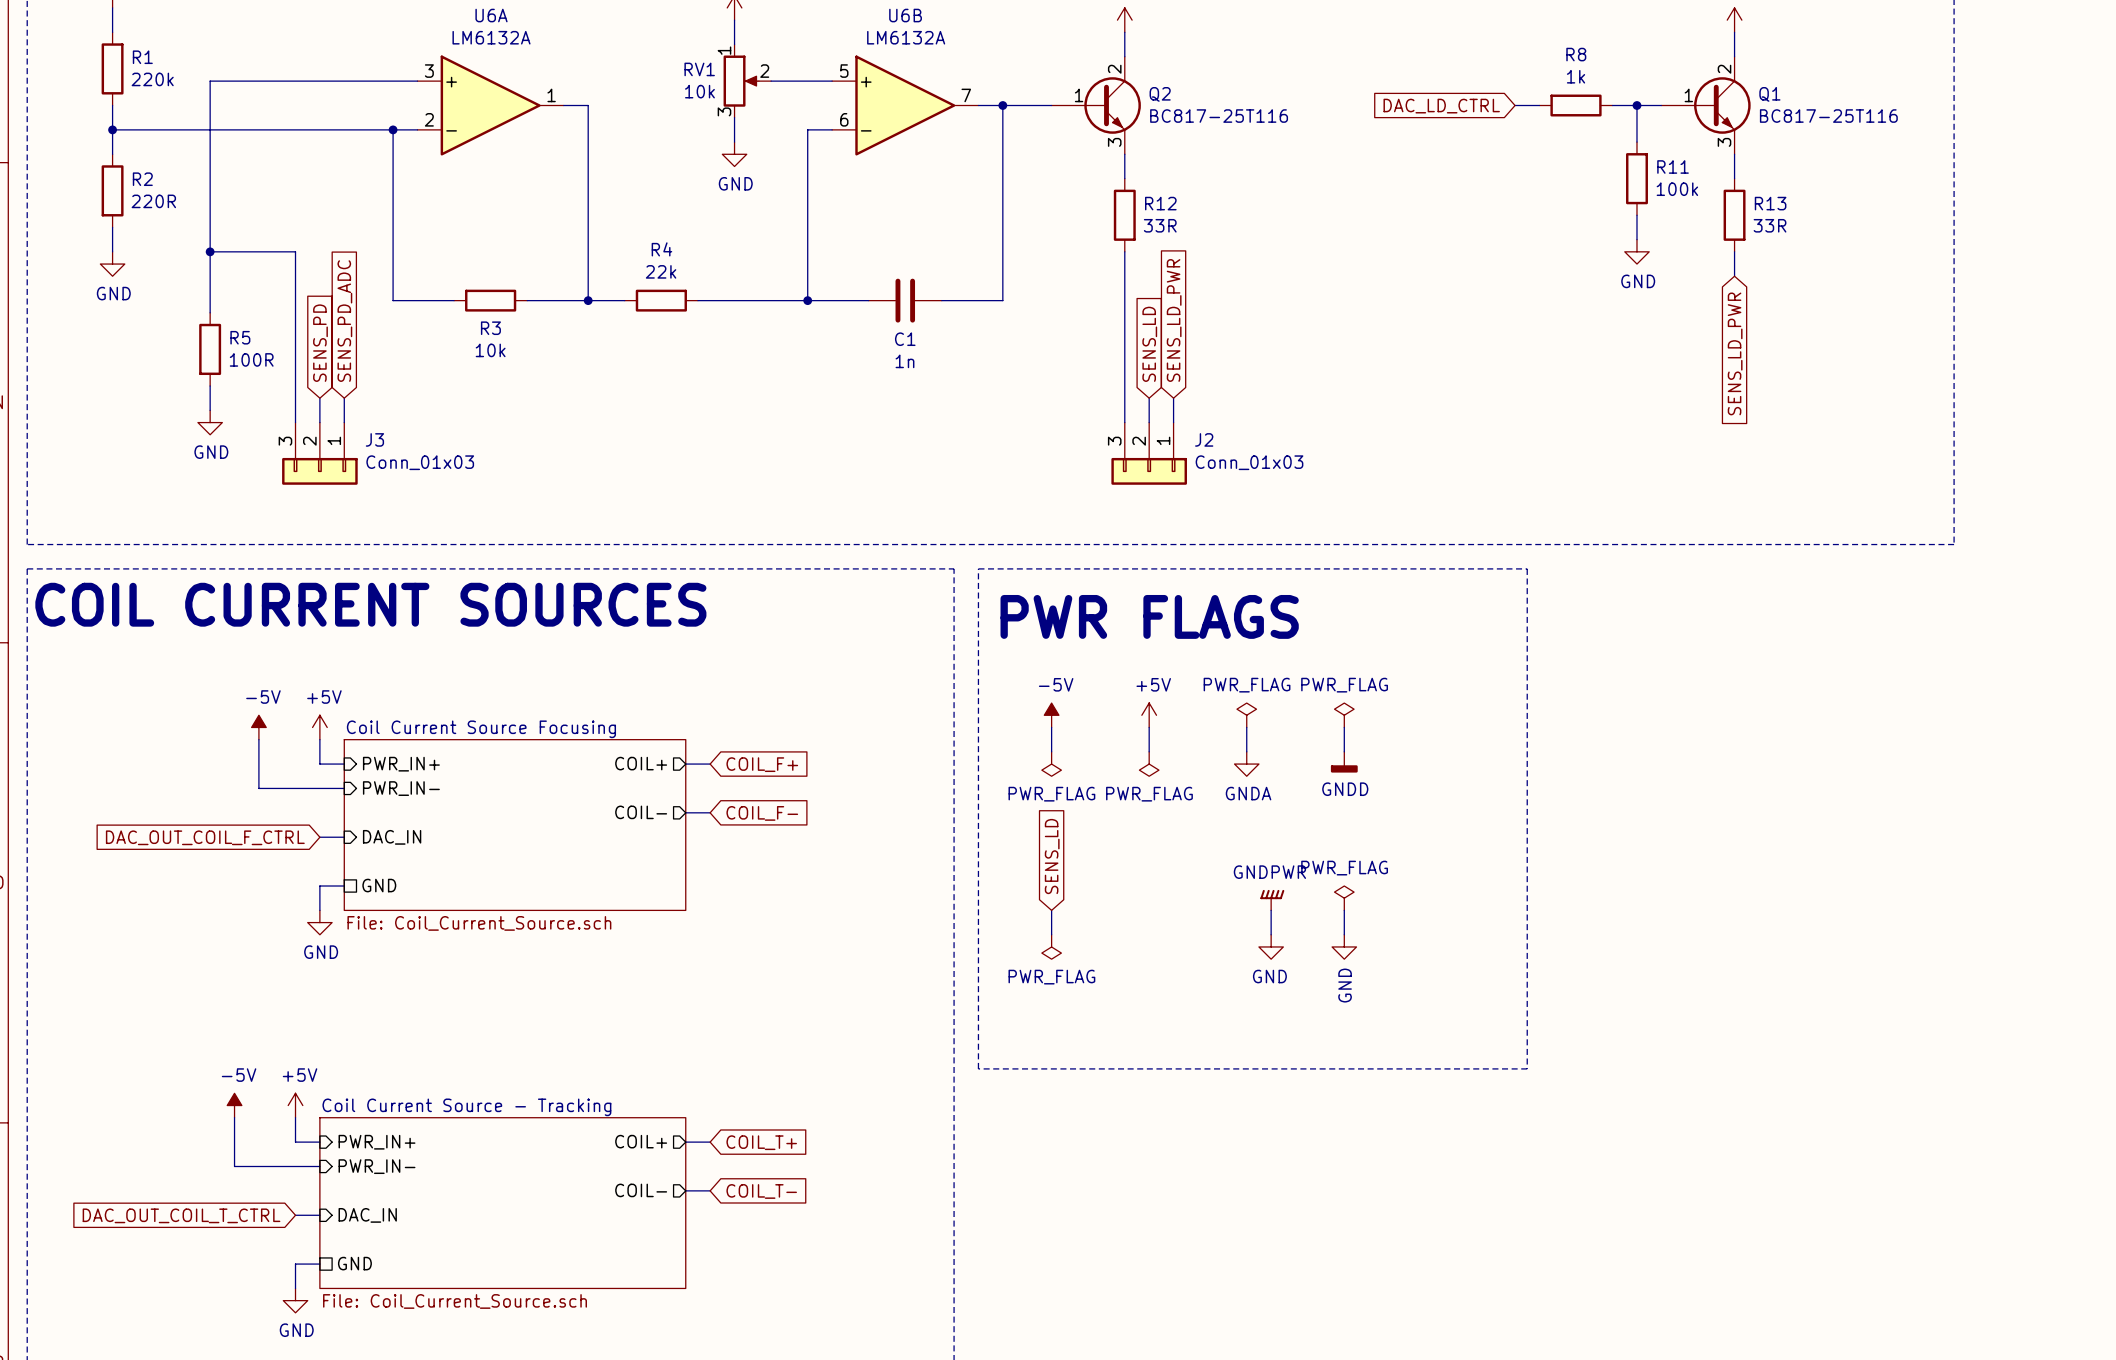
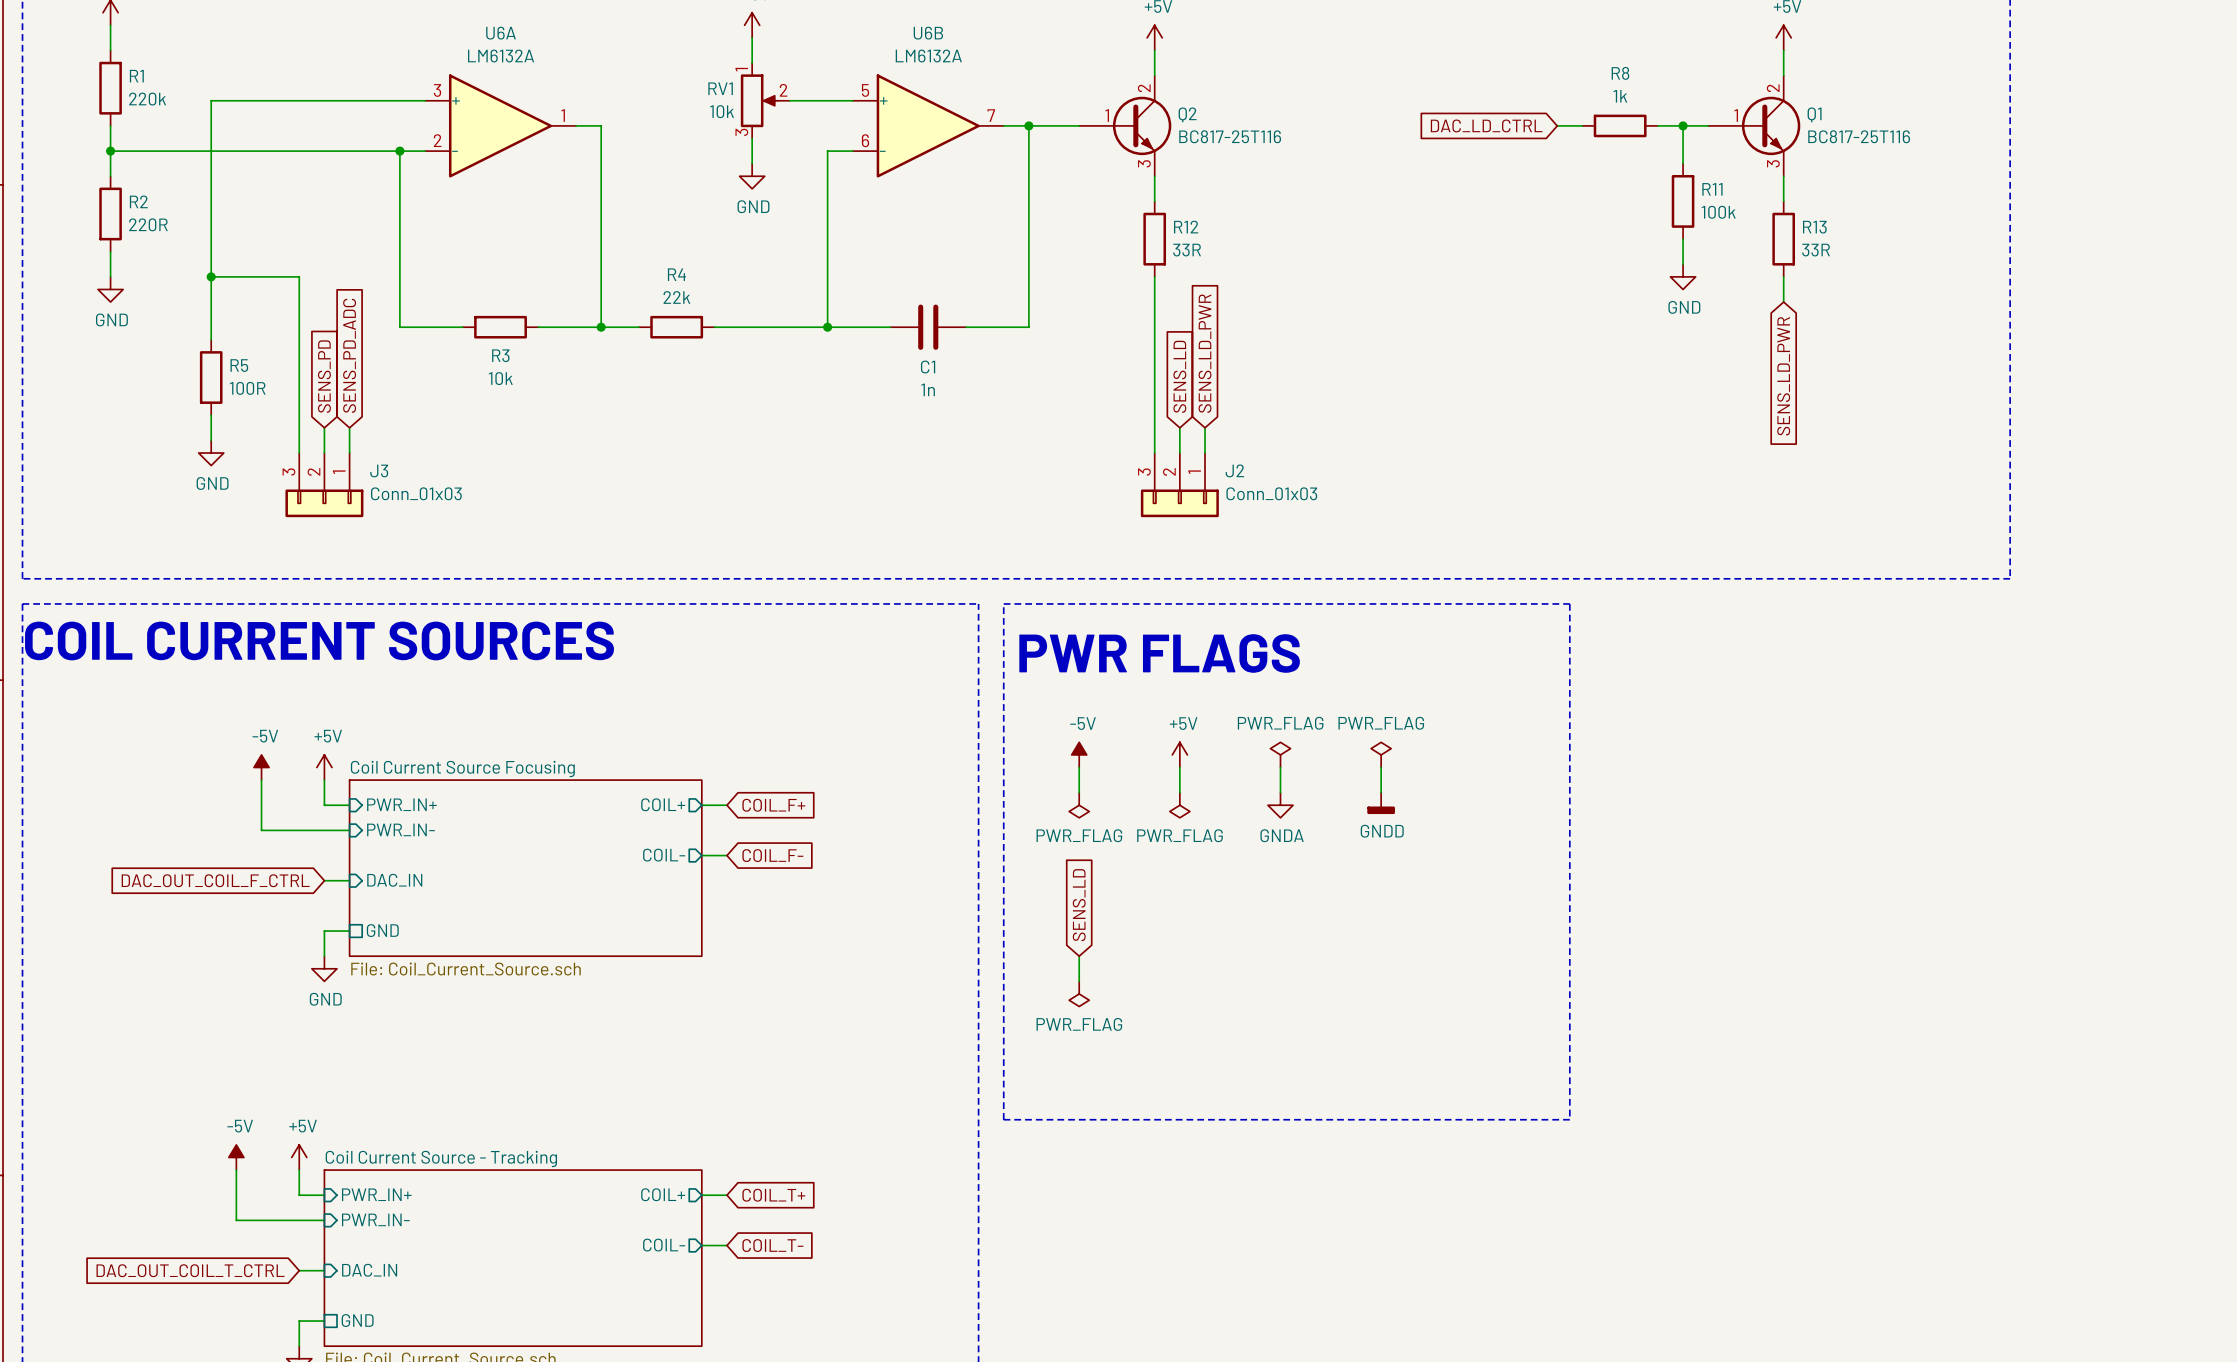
power symbol: PWR_FLAG (1344, 898) -> none
power symbol: GNDPWR (1272, 900) -> none
wire: (1271, 910) (1271, 934) -> none
wire: (1344, 910) (1344, 934) -> none
power symbol: GND (1271, 946) -> none
power symbol: GND (1344, 946) -> none

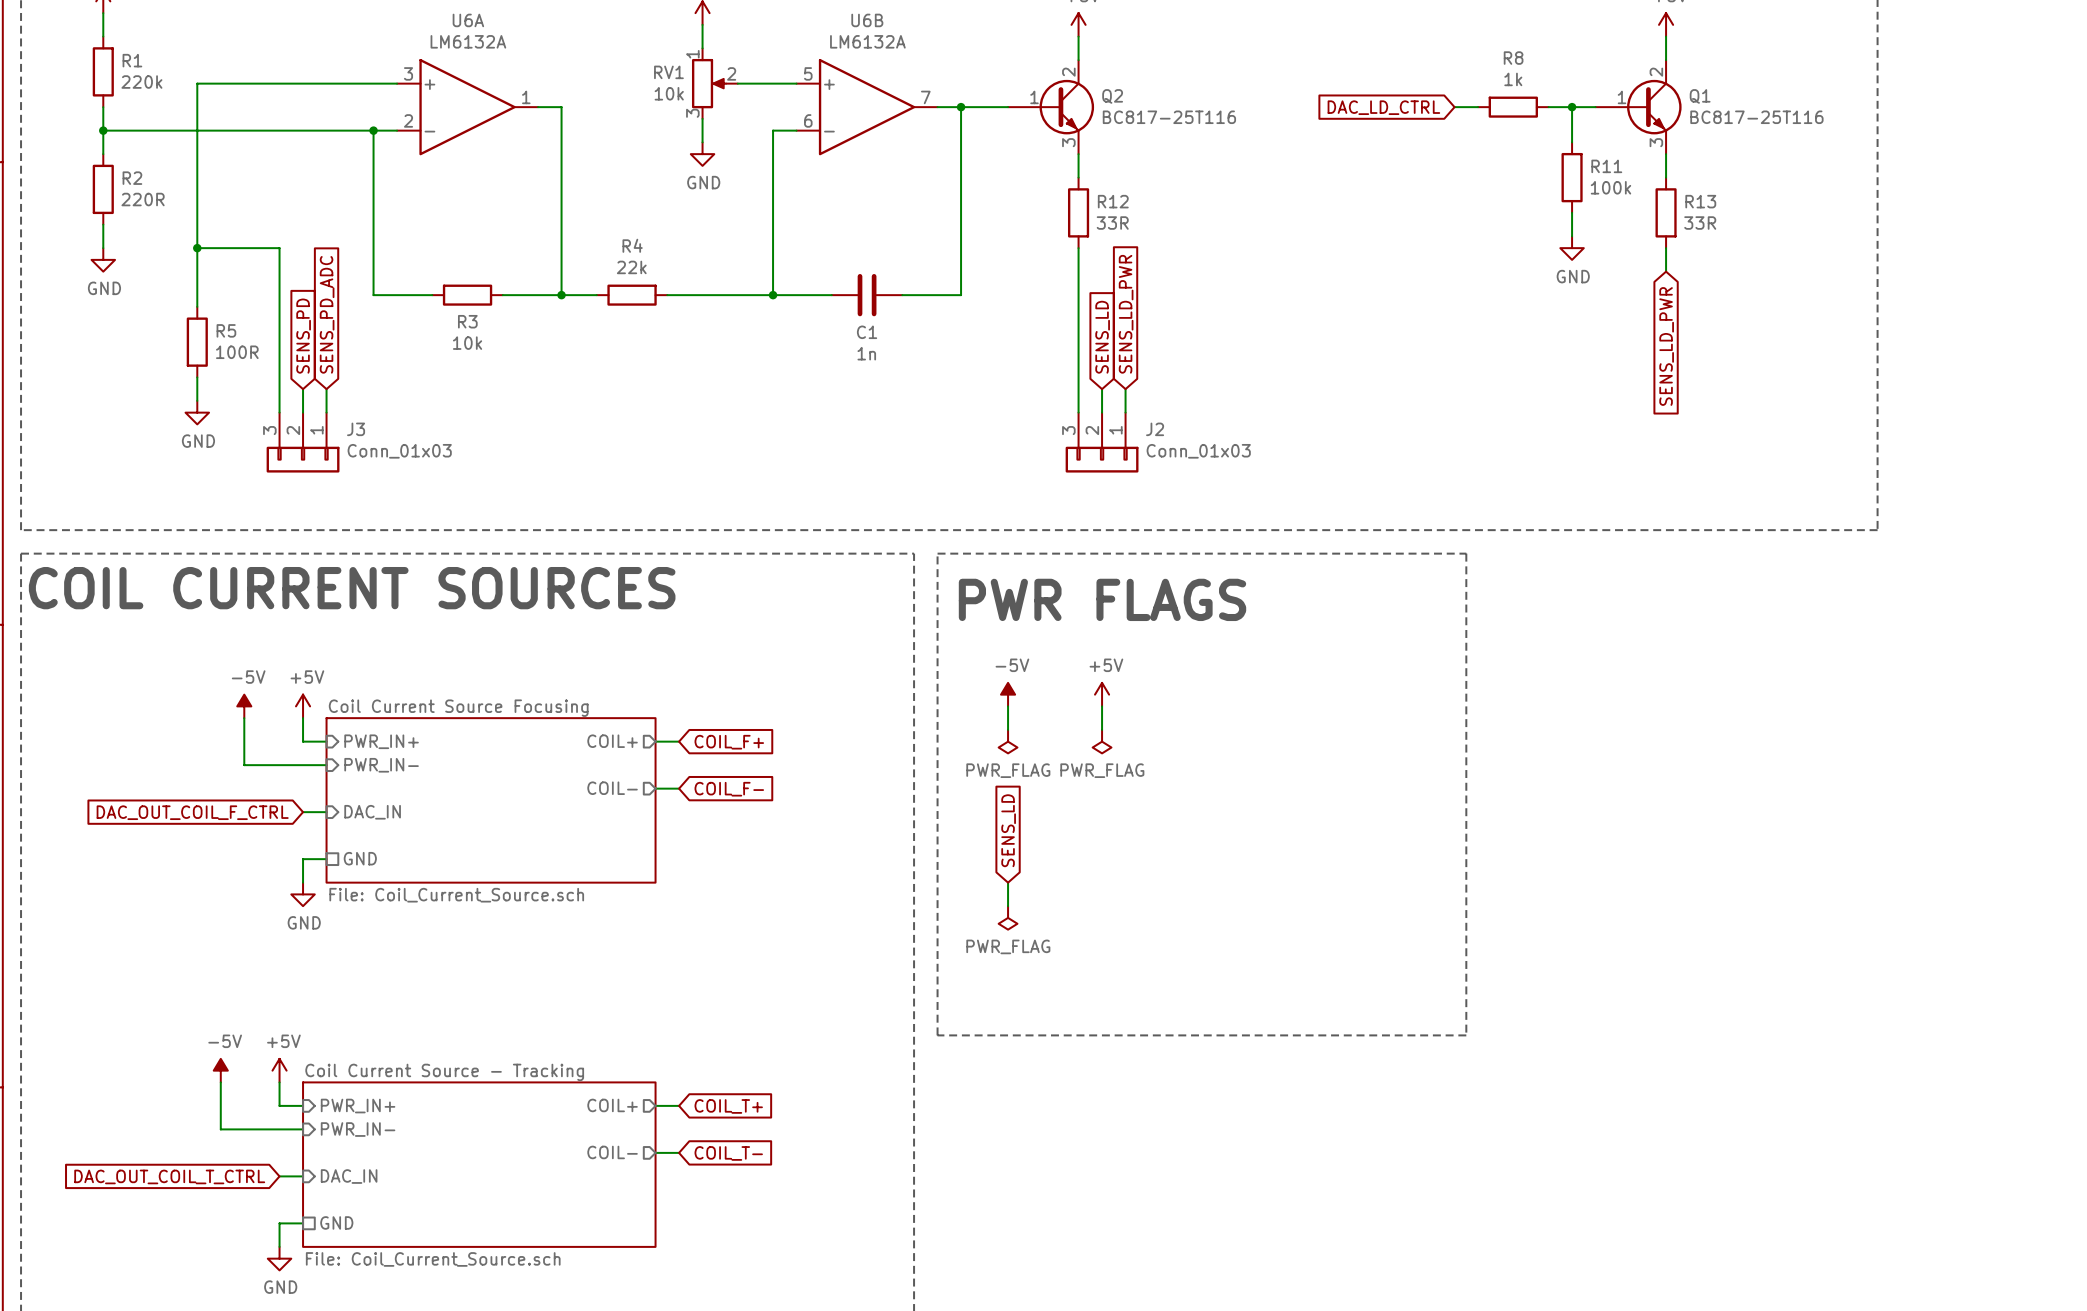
power symbol: PWR_FLAG (1280, 754) -> none
power symbol: PWR_FLAG (1381, 754) -> none
wire: (1280, 767) (1280, 792) -> none
wire: (1381, 767) (1381, 792) -> none
power symbol: GNDD (1381, 803) -> none
power symbol: GNDA (1280, 805) -> none

